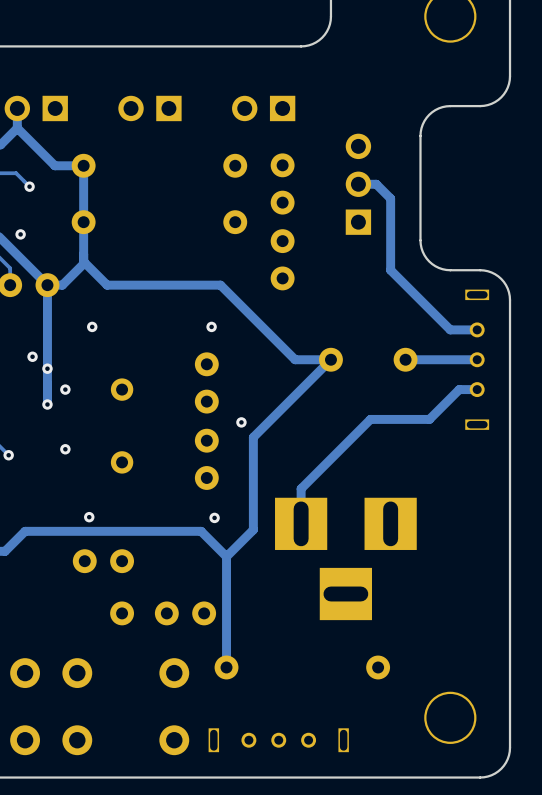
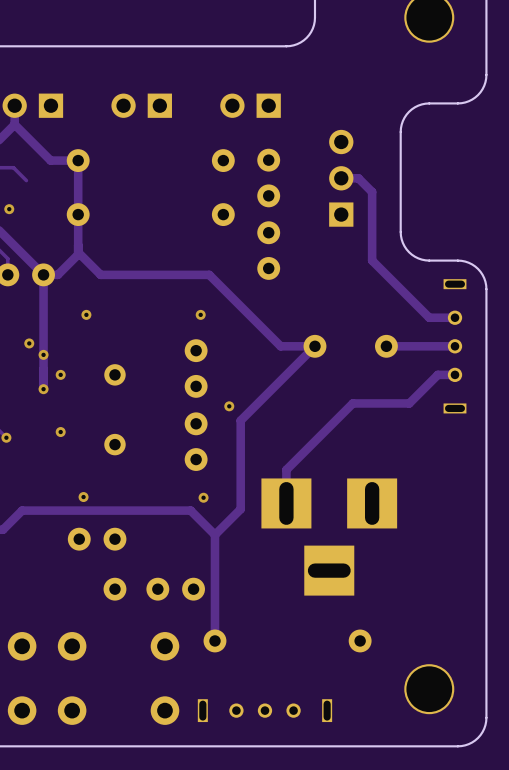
via: (29, 186) -> none
via: none -> (9, 209)
via: (20, 234) -> none

